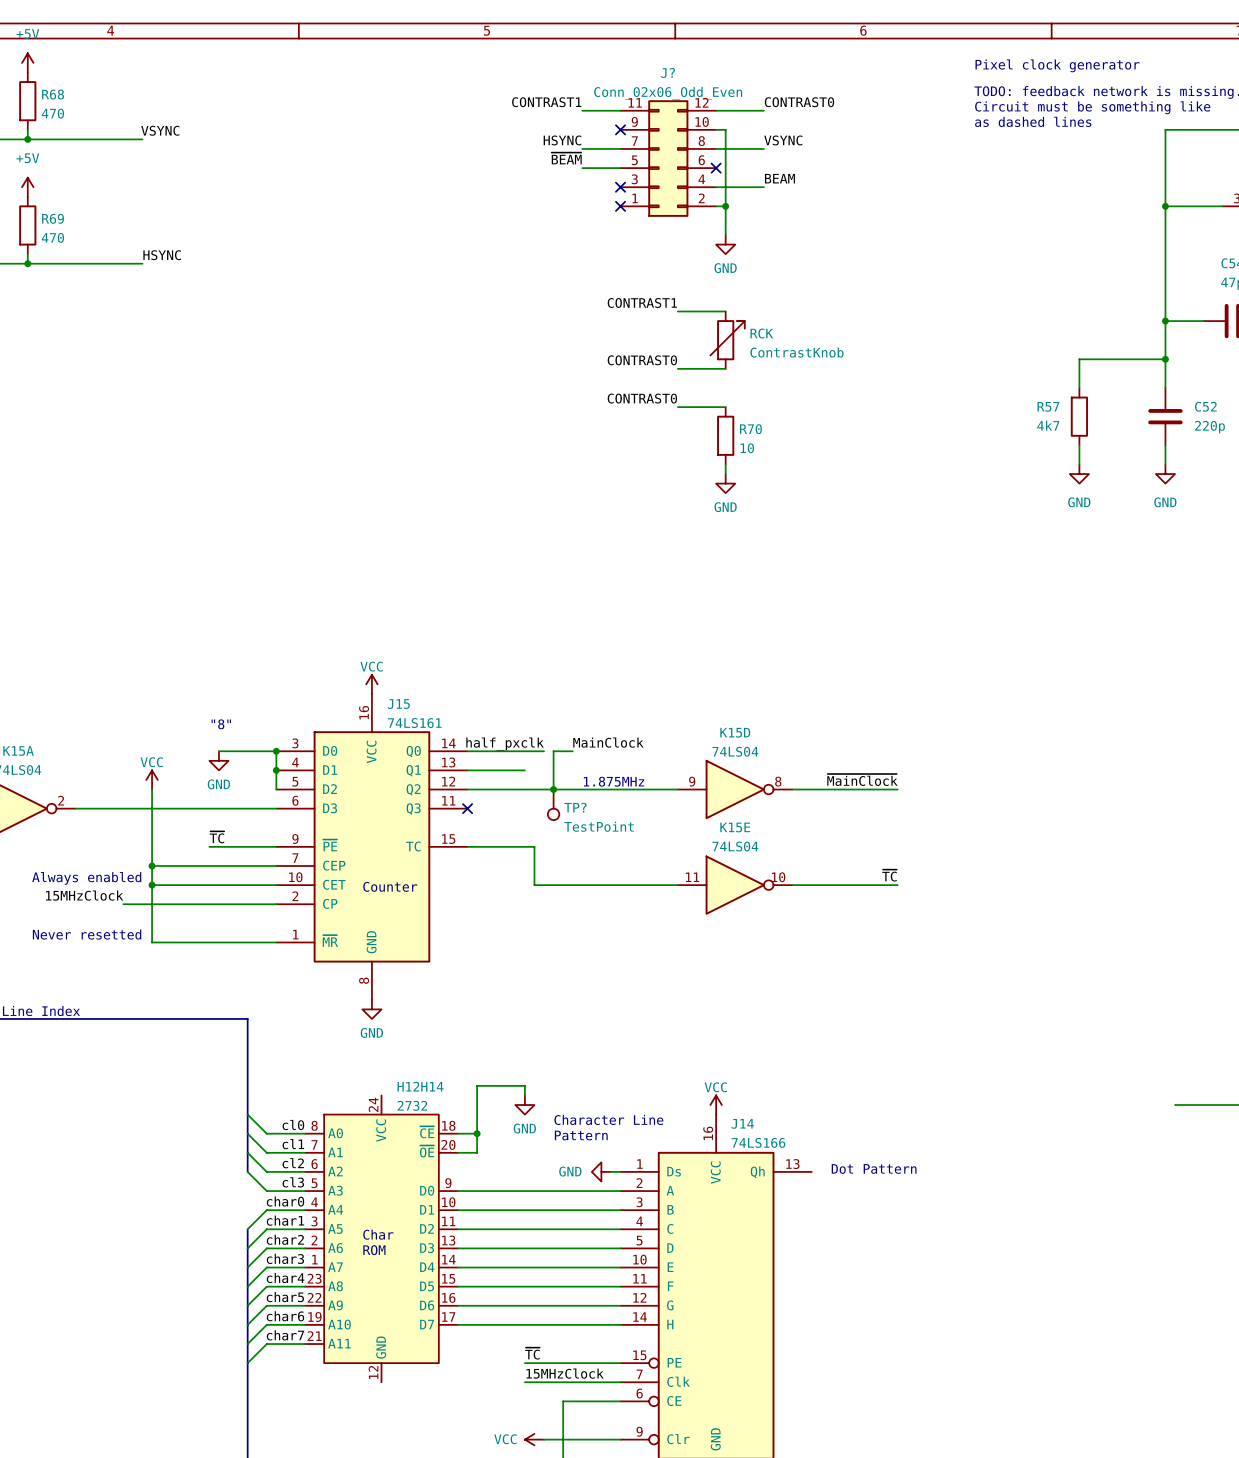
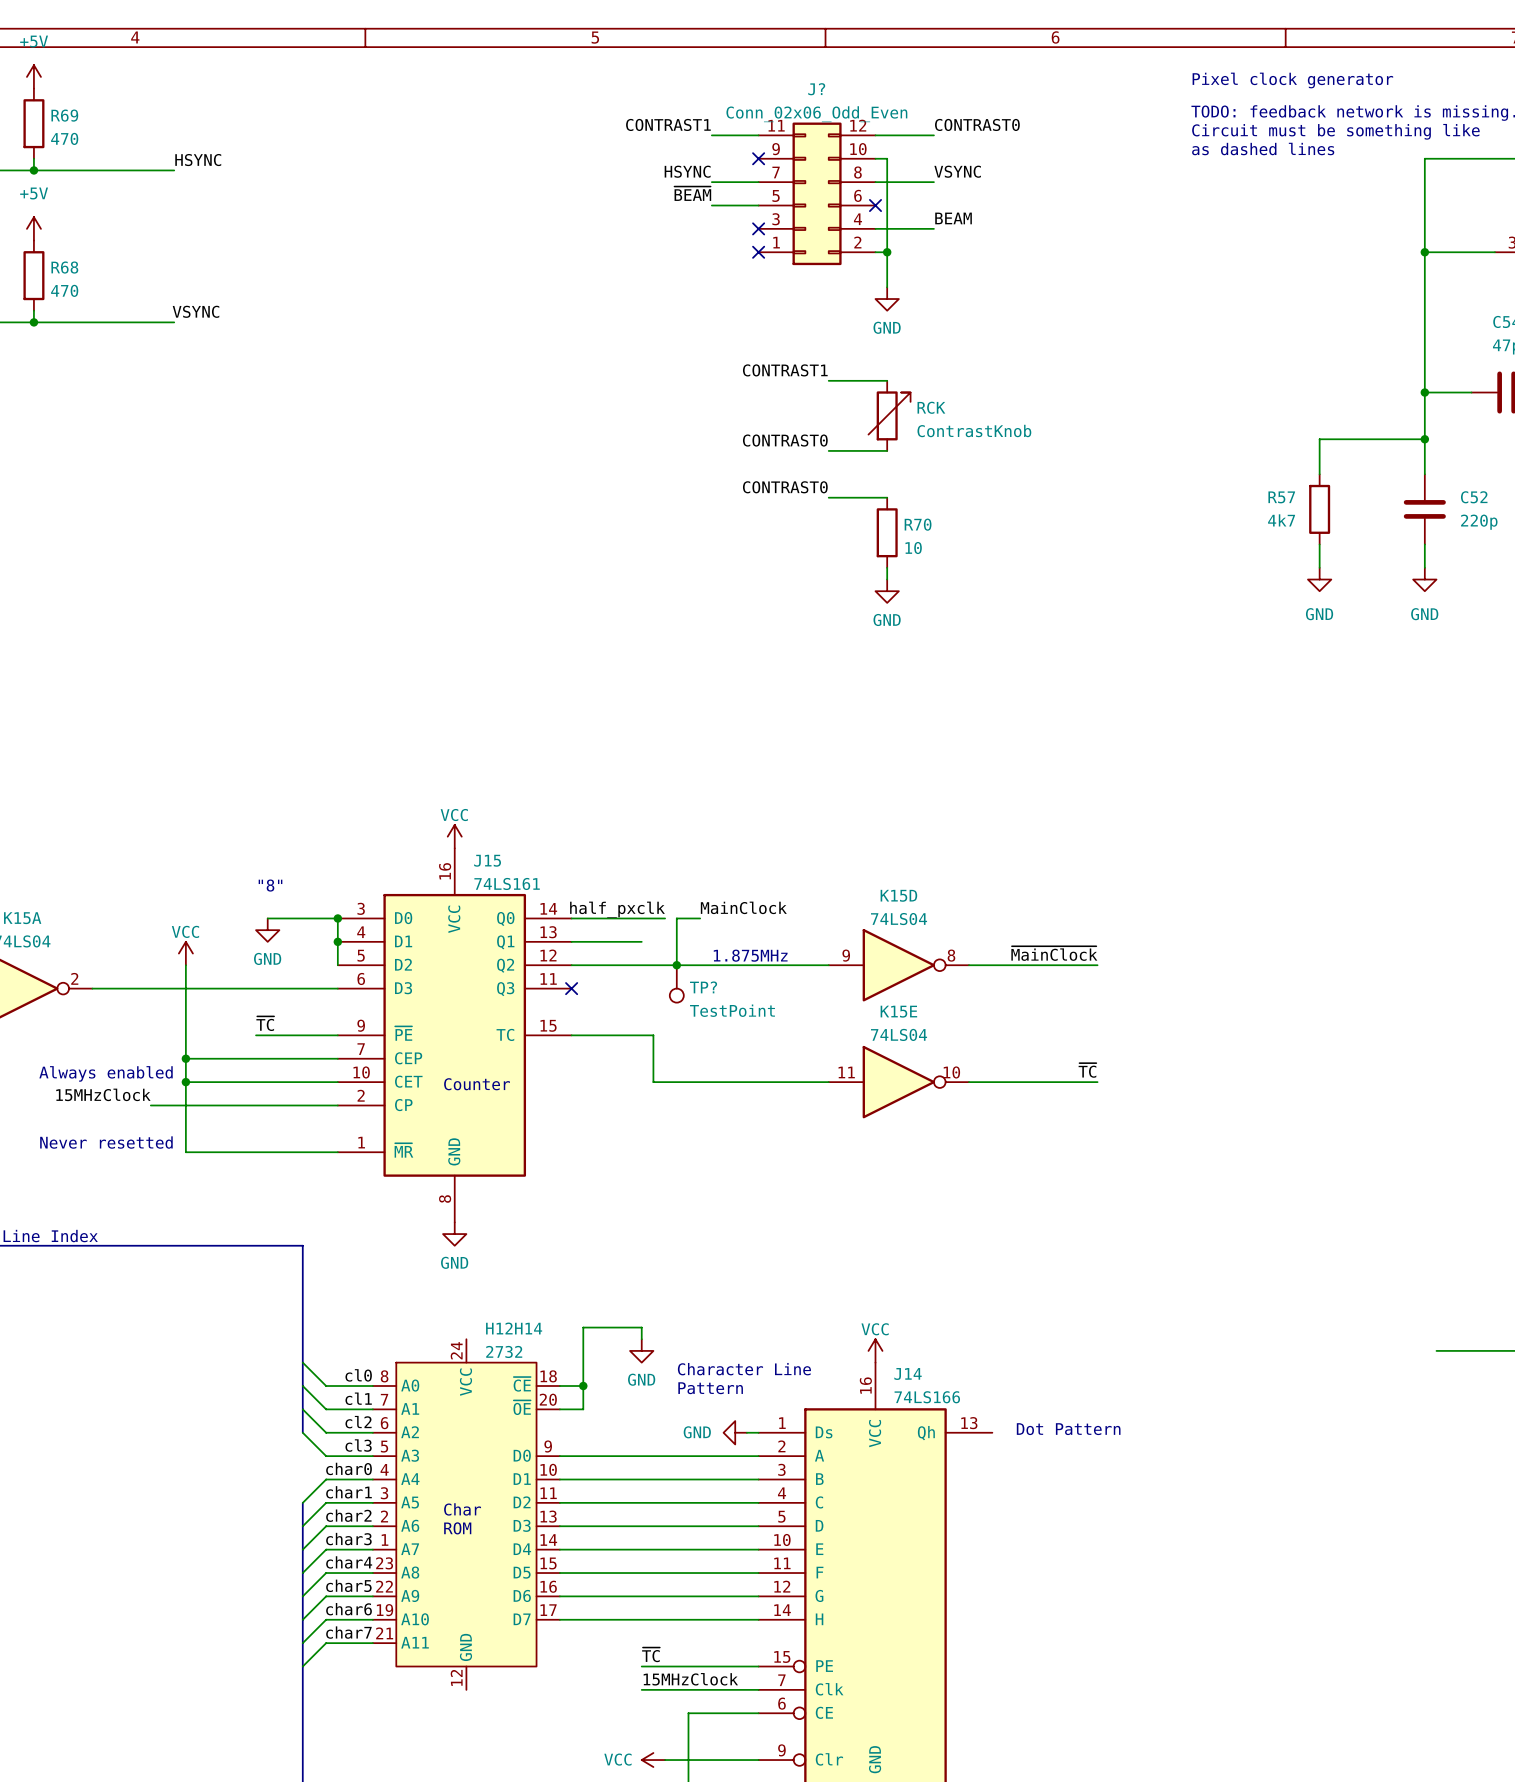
R68 name: R68 (53, 94) -> R69 (64, 115)
label: VSYNC (160, 130) -> HSYNC (198, 160)
R69 name: R69 (53, 218) -> R68 (64, 267)
label: HSYNC (162, 255) -> VSYNC (196, 311)

